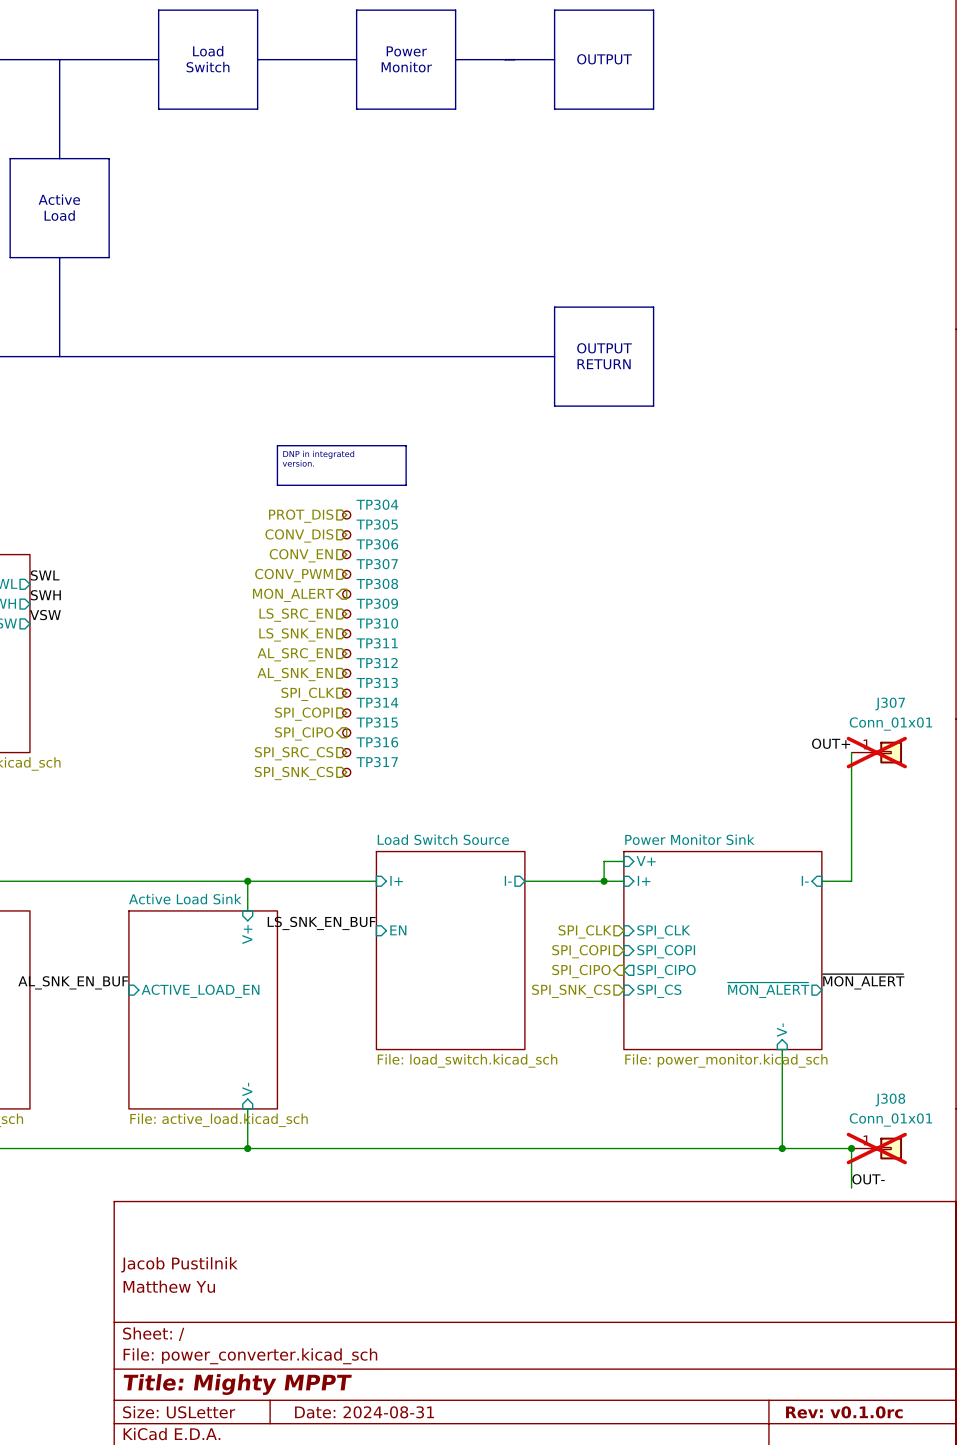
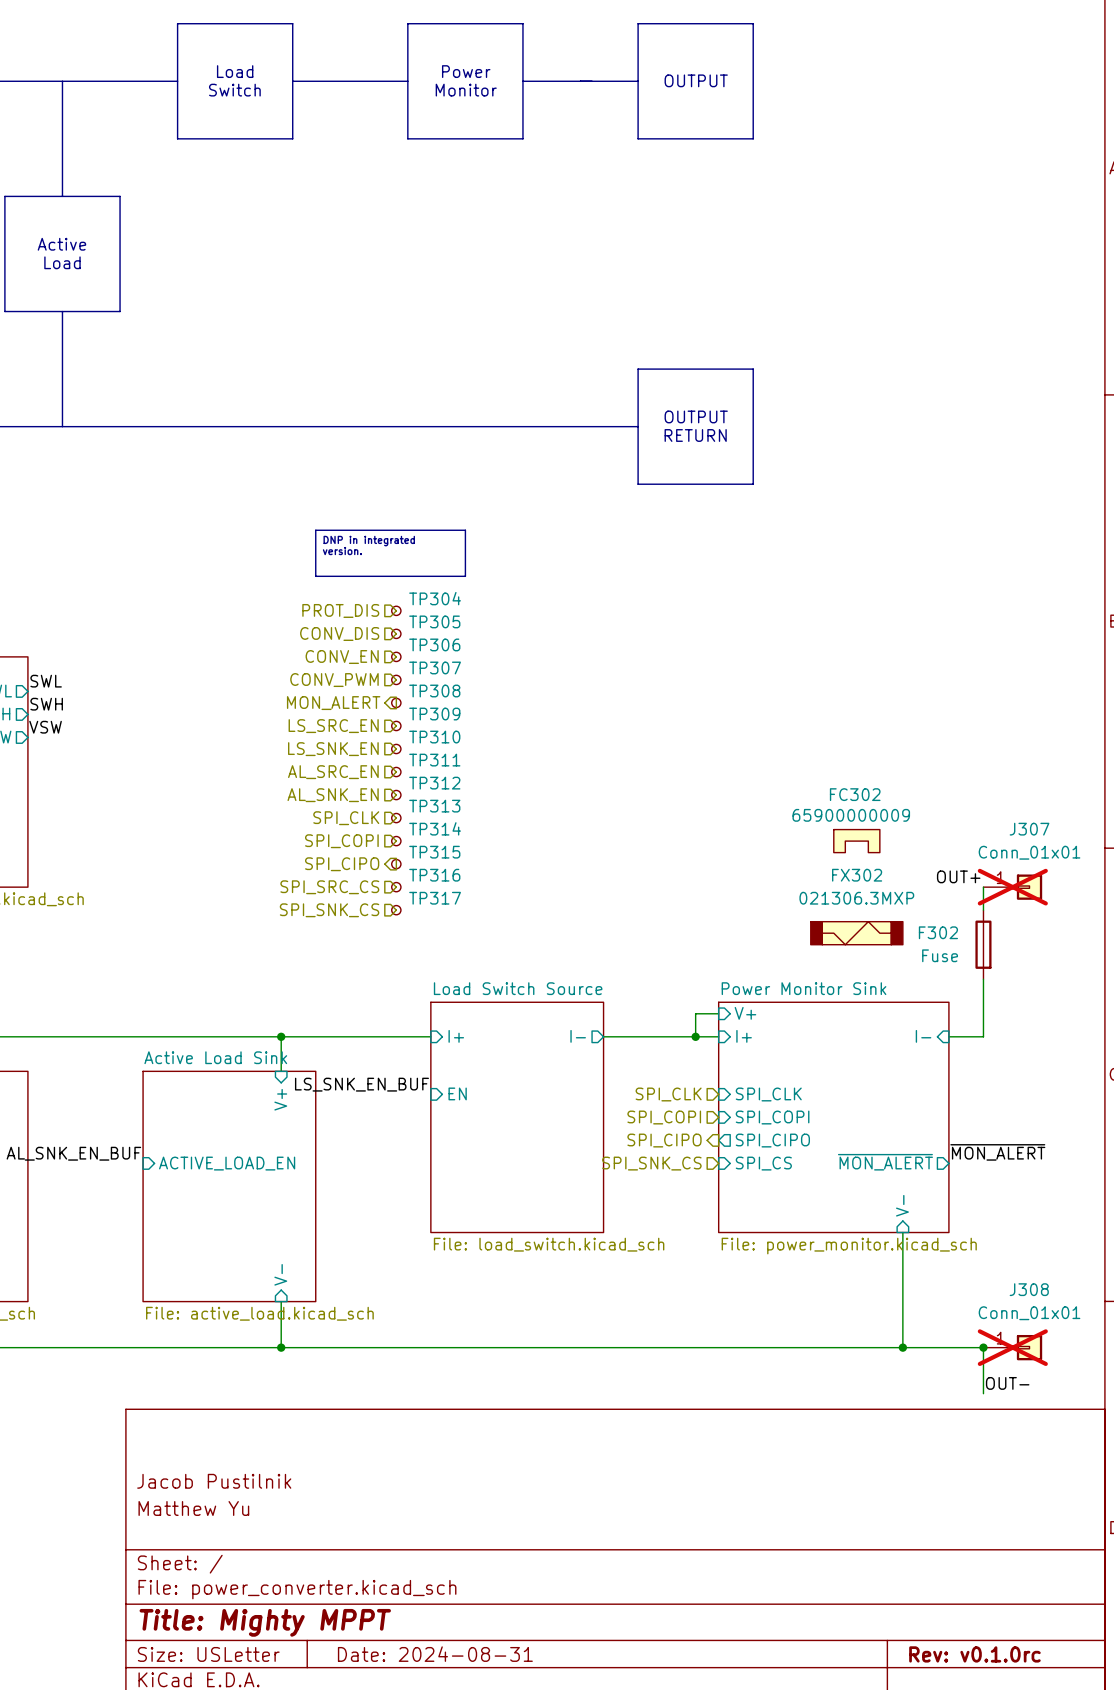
FC302: none -> 65900000009 (856, 841)
FX302: none -> 021306.3MXP (856, 933)
F302: none -> Fuse (983, 944)

